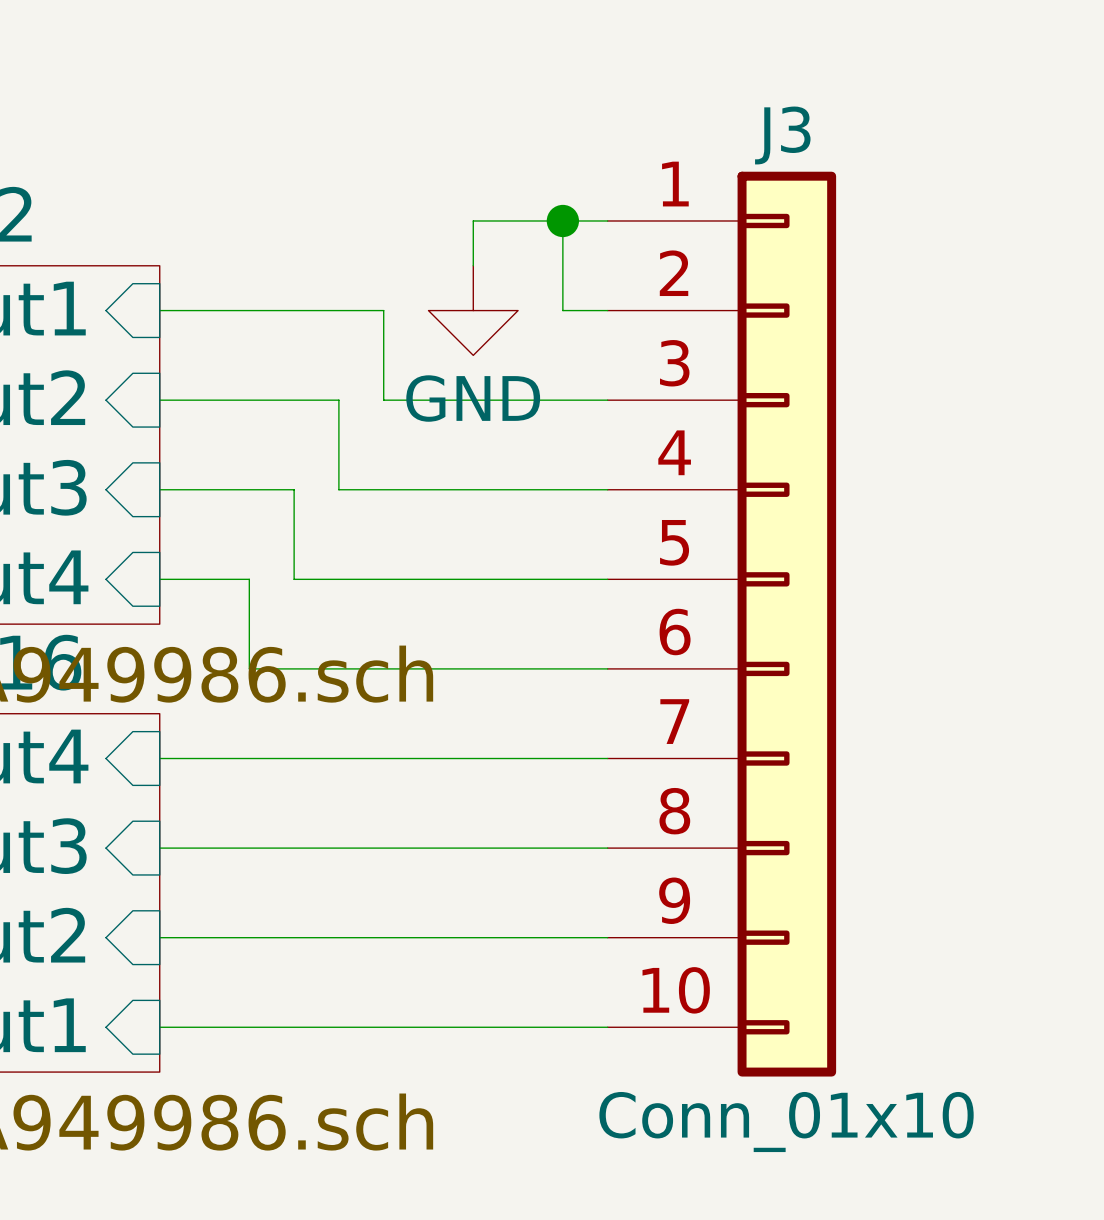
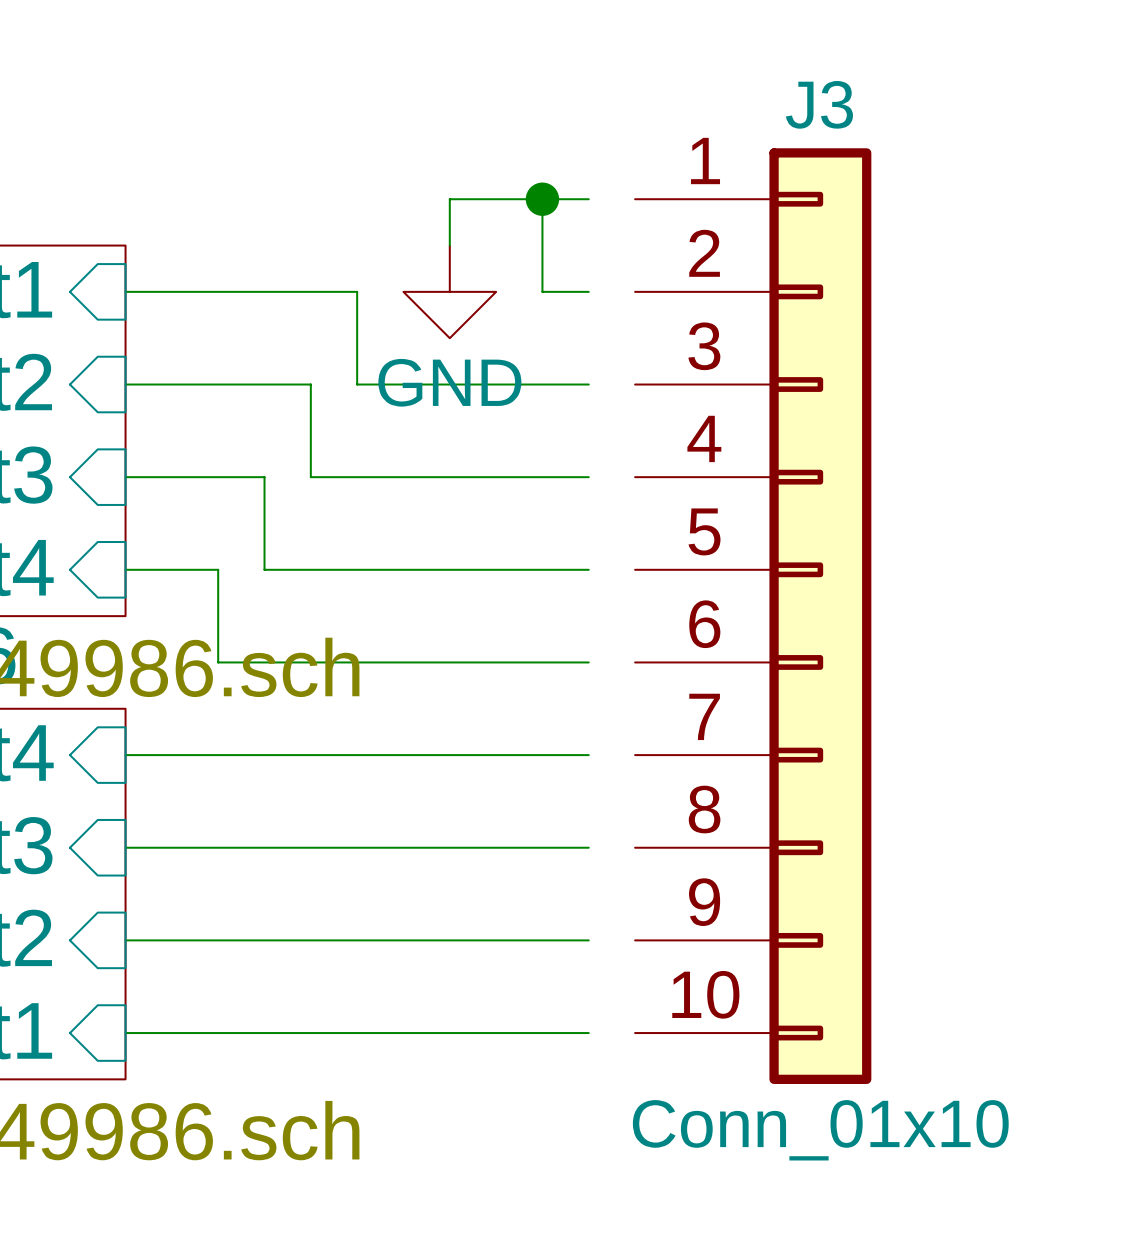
J3 position: (721, 624) -> (753, 616)

